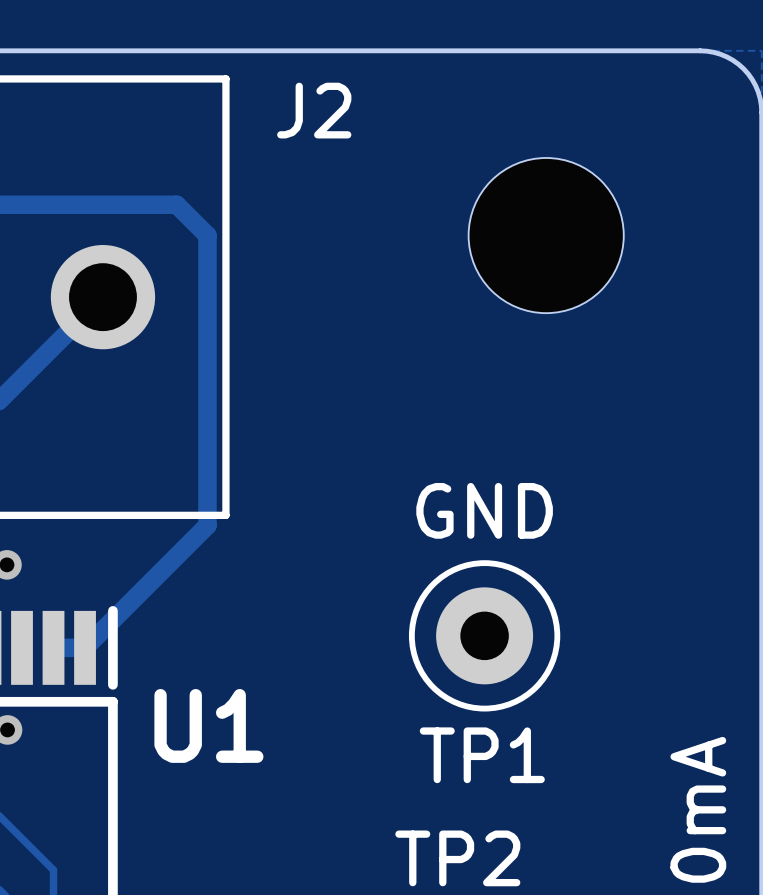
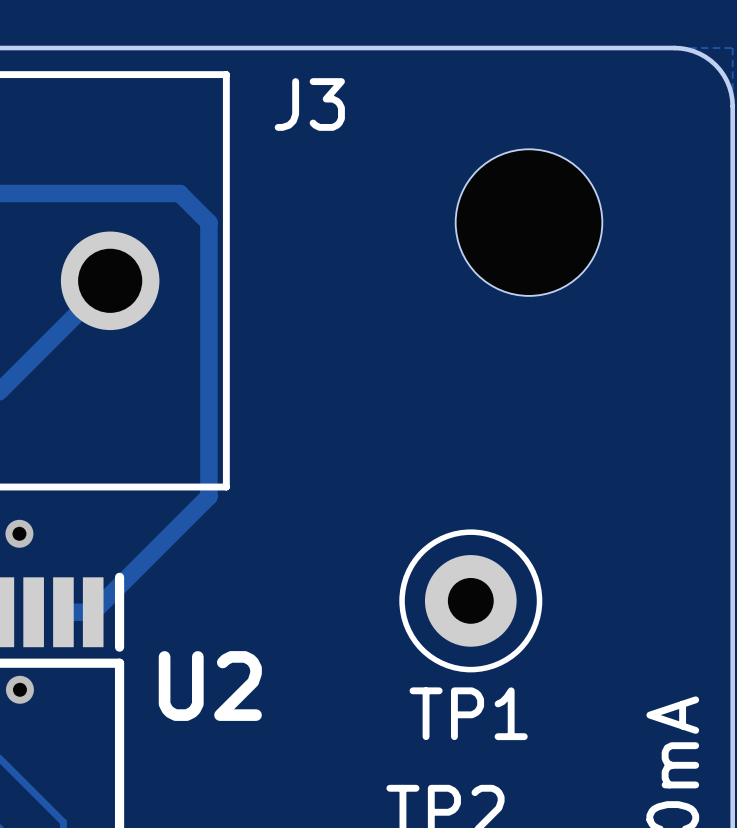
J2 name: J2 (314, 110) -> J3 (309, 104)
text: GND (484, 510) -> none
U1 name: U1 (208, 725) -> U2 (210, 686)

